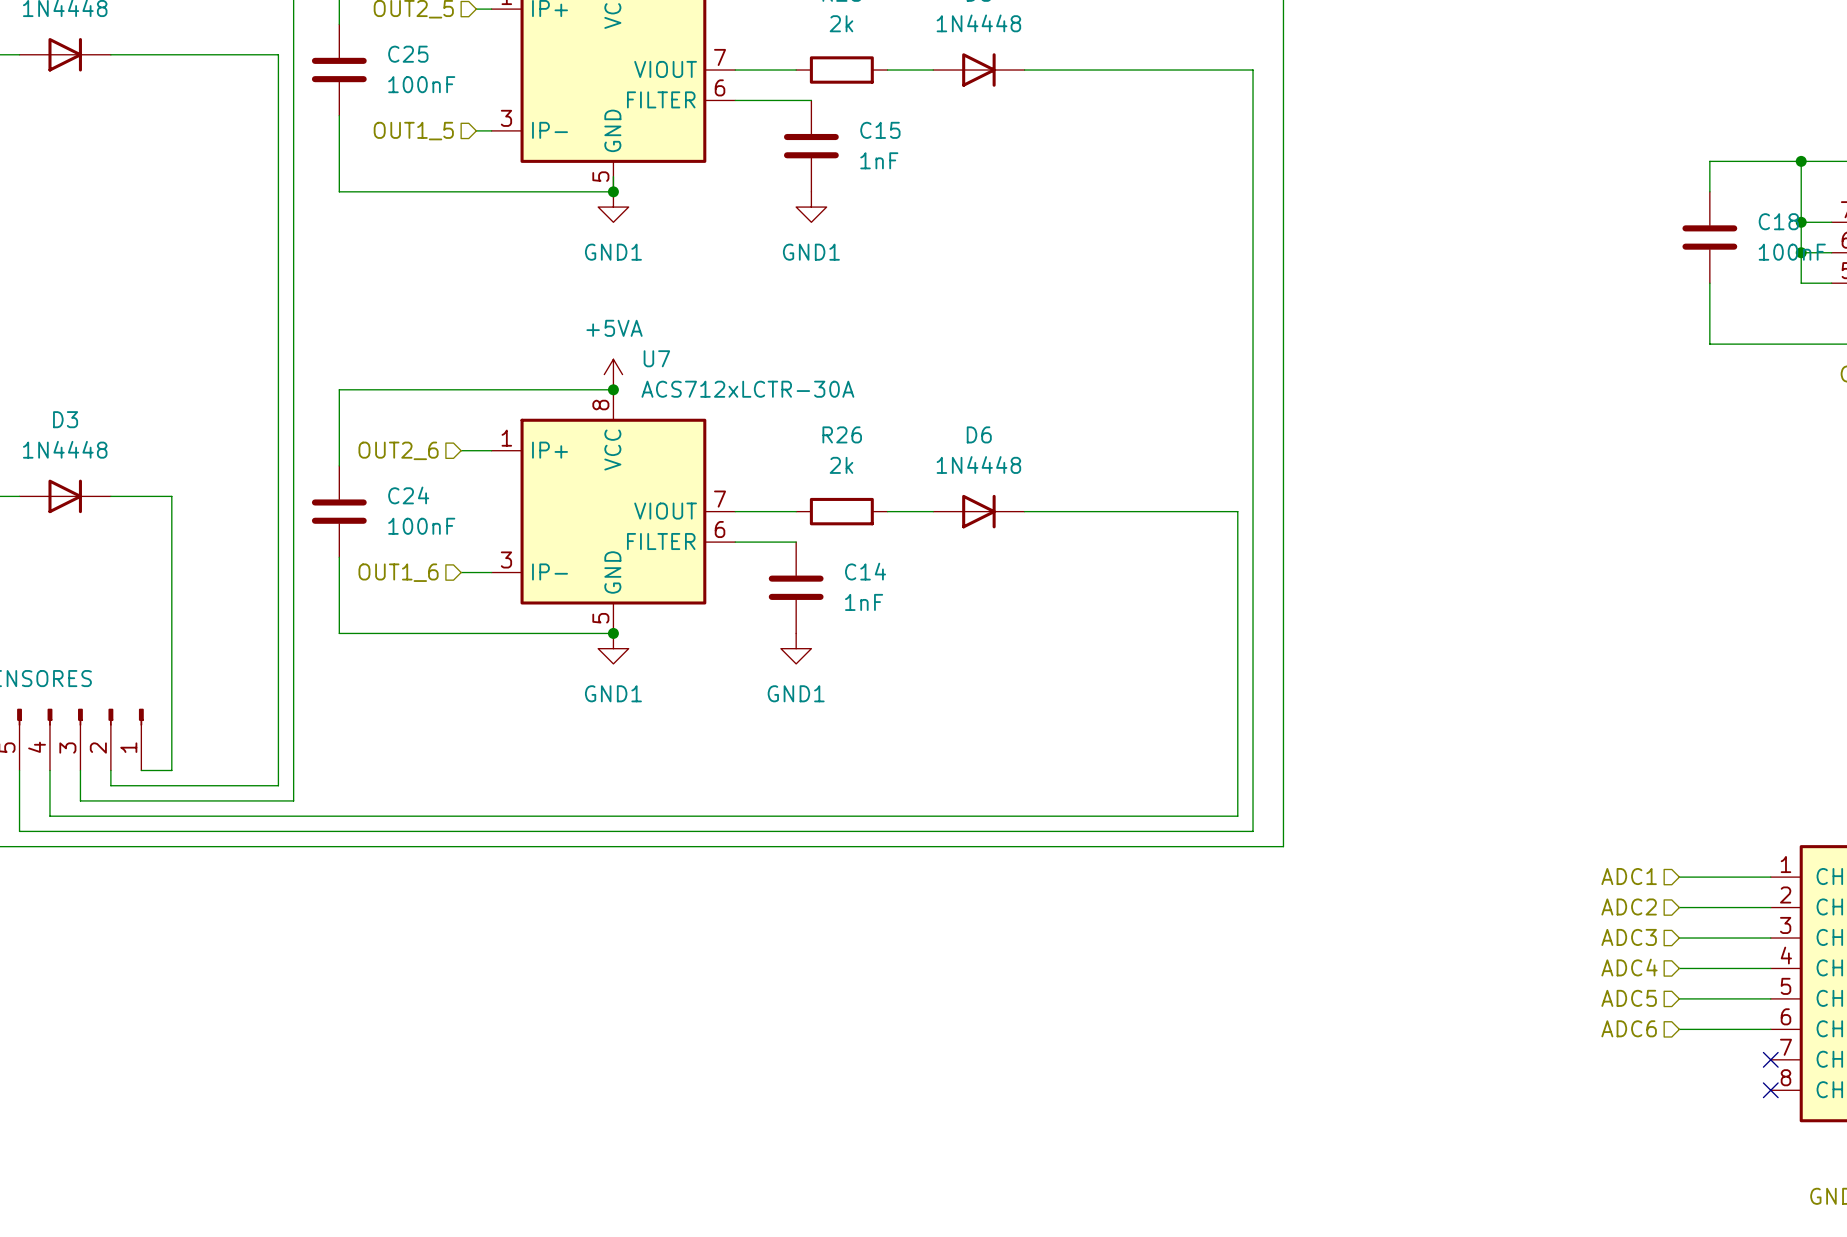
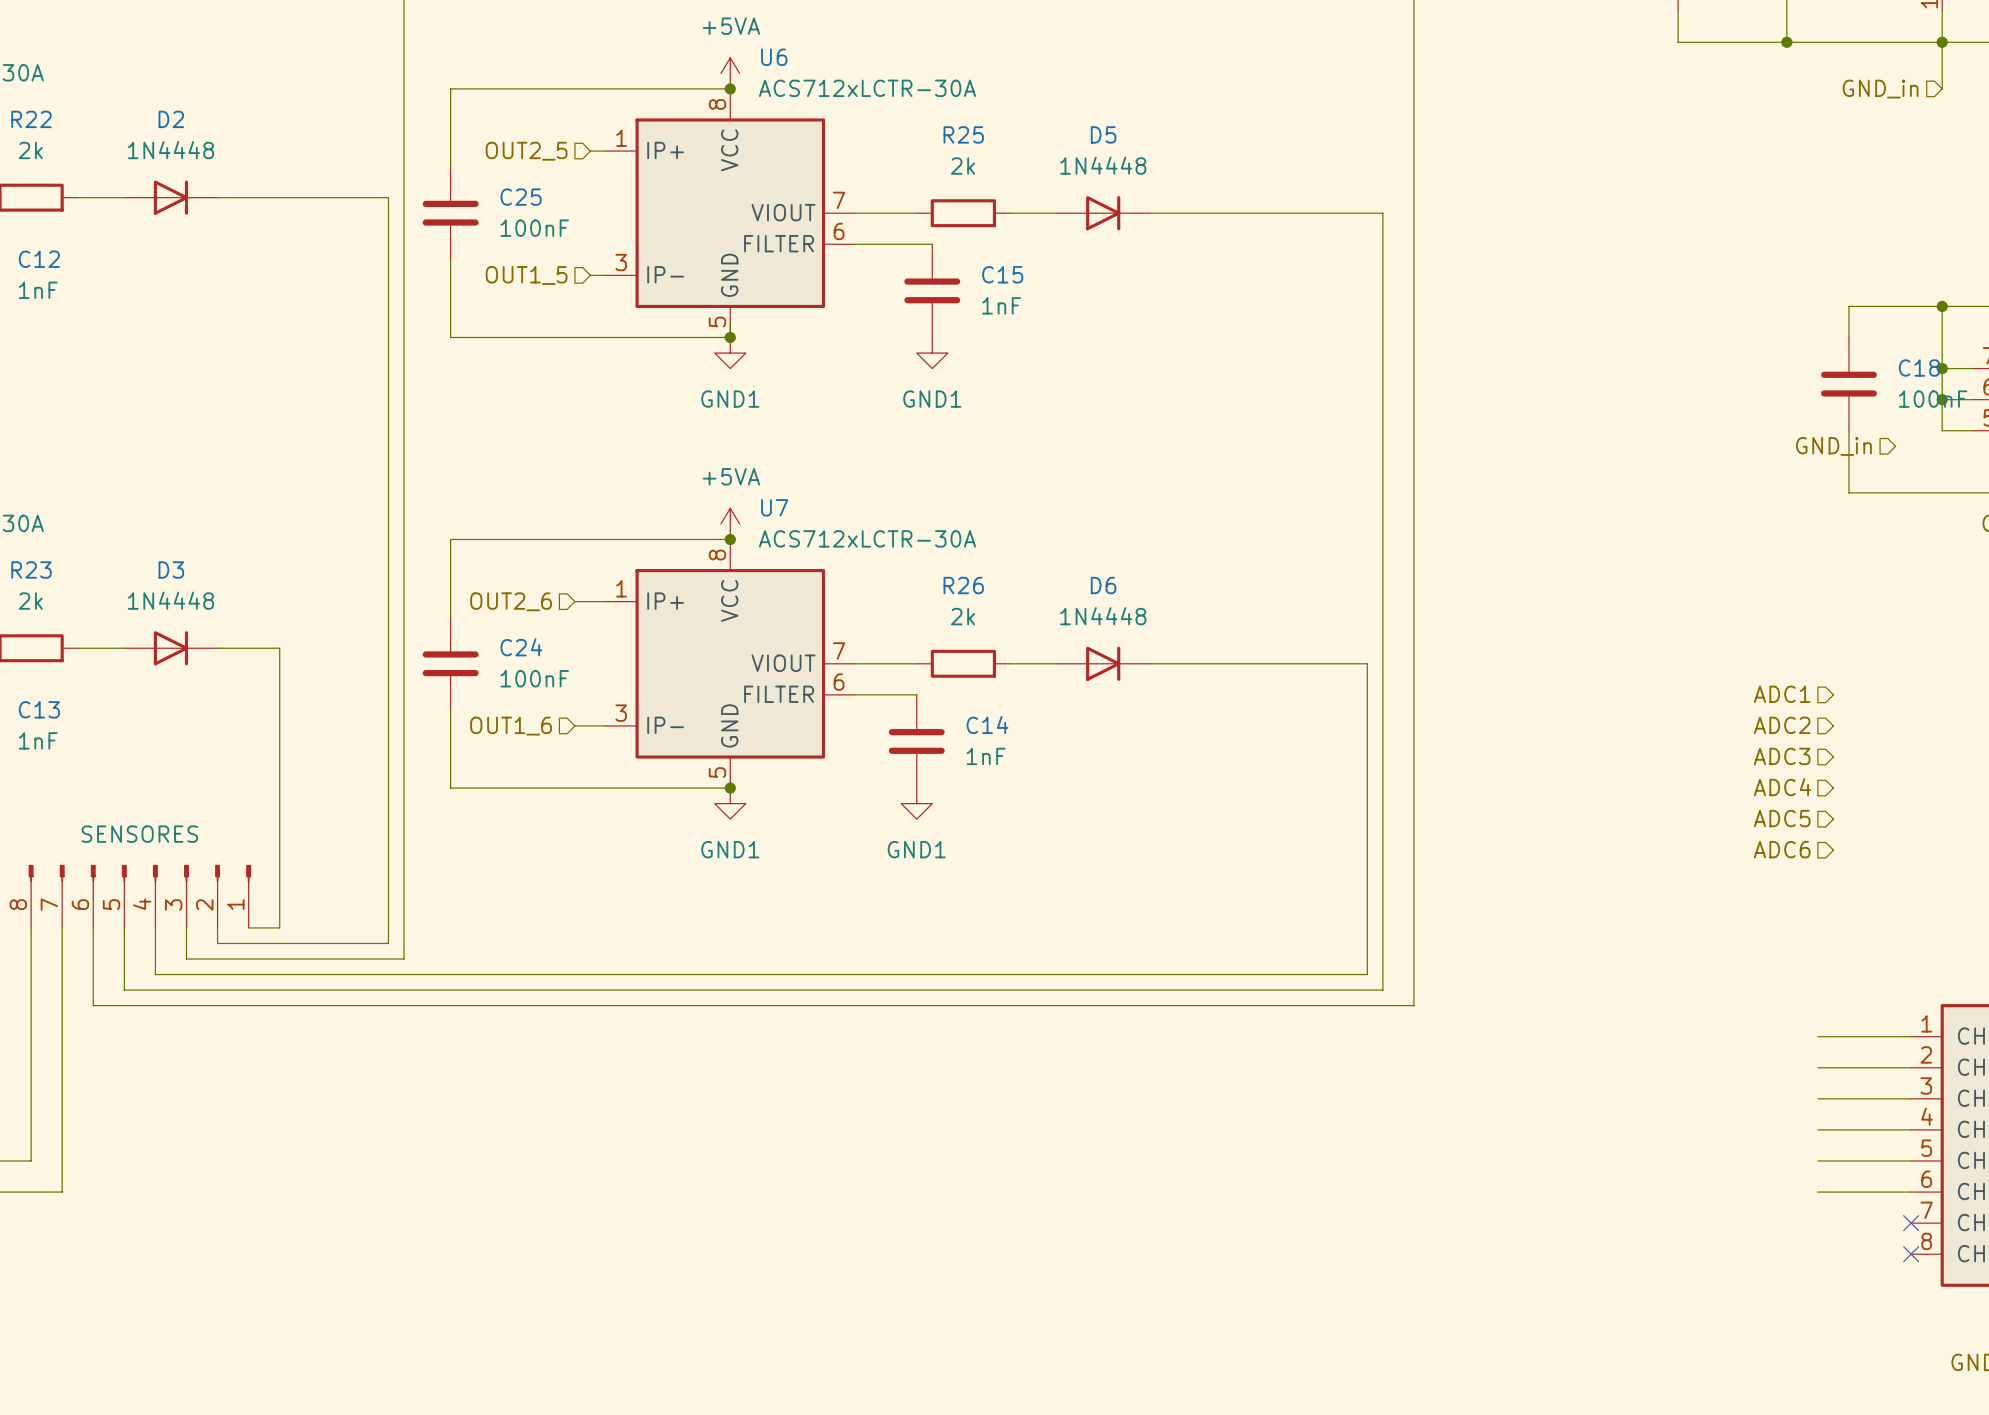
hierarchical label: none -> GND_in (1833, 446)
hierarchical label: none -> ADC1 (1782, 694)
hierarchical label: none -> ADC2 (1782, 725)
hierarchical label: none -> ADC3 (1782, 756)
hierarchical label: none -> ADC4 (1782, 787)
hierarchical label: none -> ADC5 (1782, 818)
hierarchical label: none -> ADC6 (1782, 849)
hierarchical label: ADC1 (1629, 876) -> none
hierarchical label: ADC2 (1629, 906) -> none
hierarchical label: ADC3 (1629, 937) -> none
hierarchical label: ADC4 (1629, 967) -> none
hierarchical label: ADC5 (1629, 998) -> none
hierarchical label: ADC6 (1629, 1028) -> none

